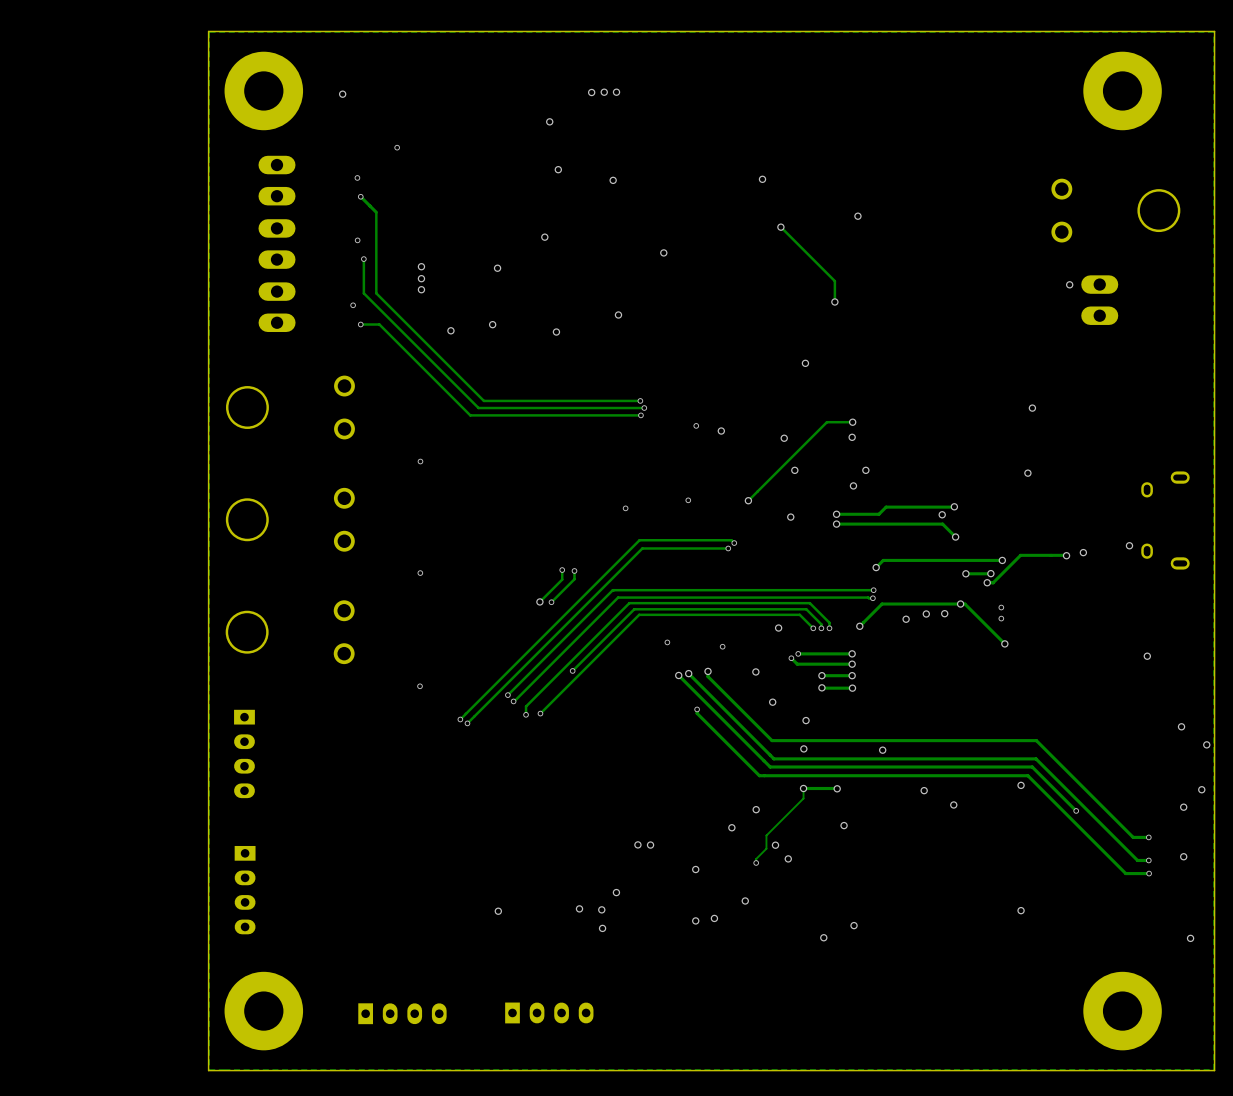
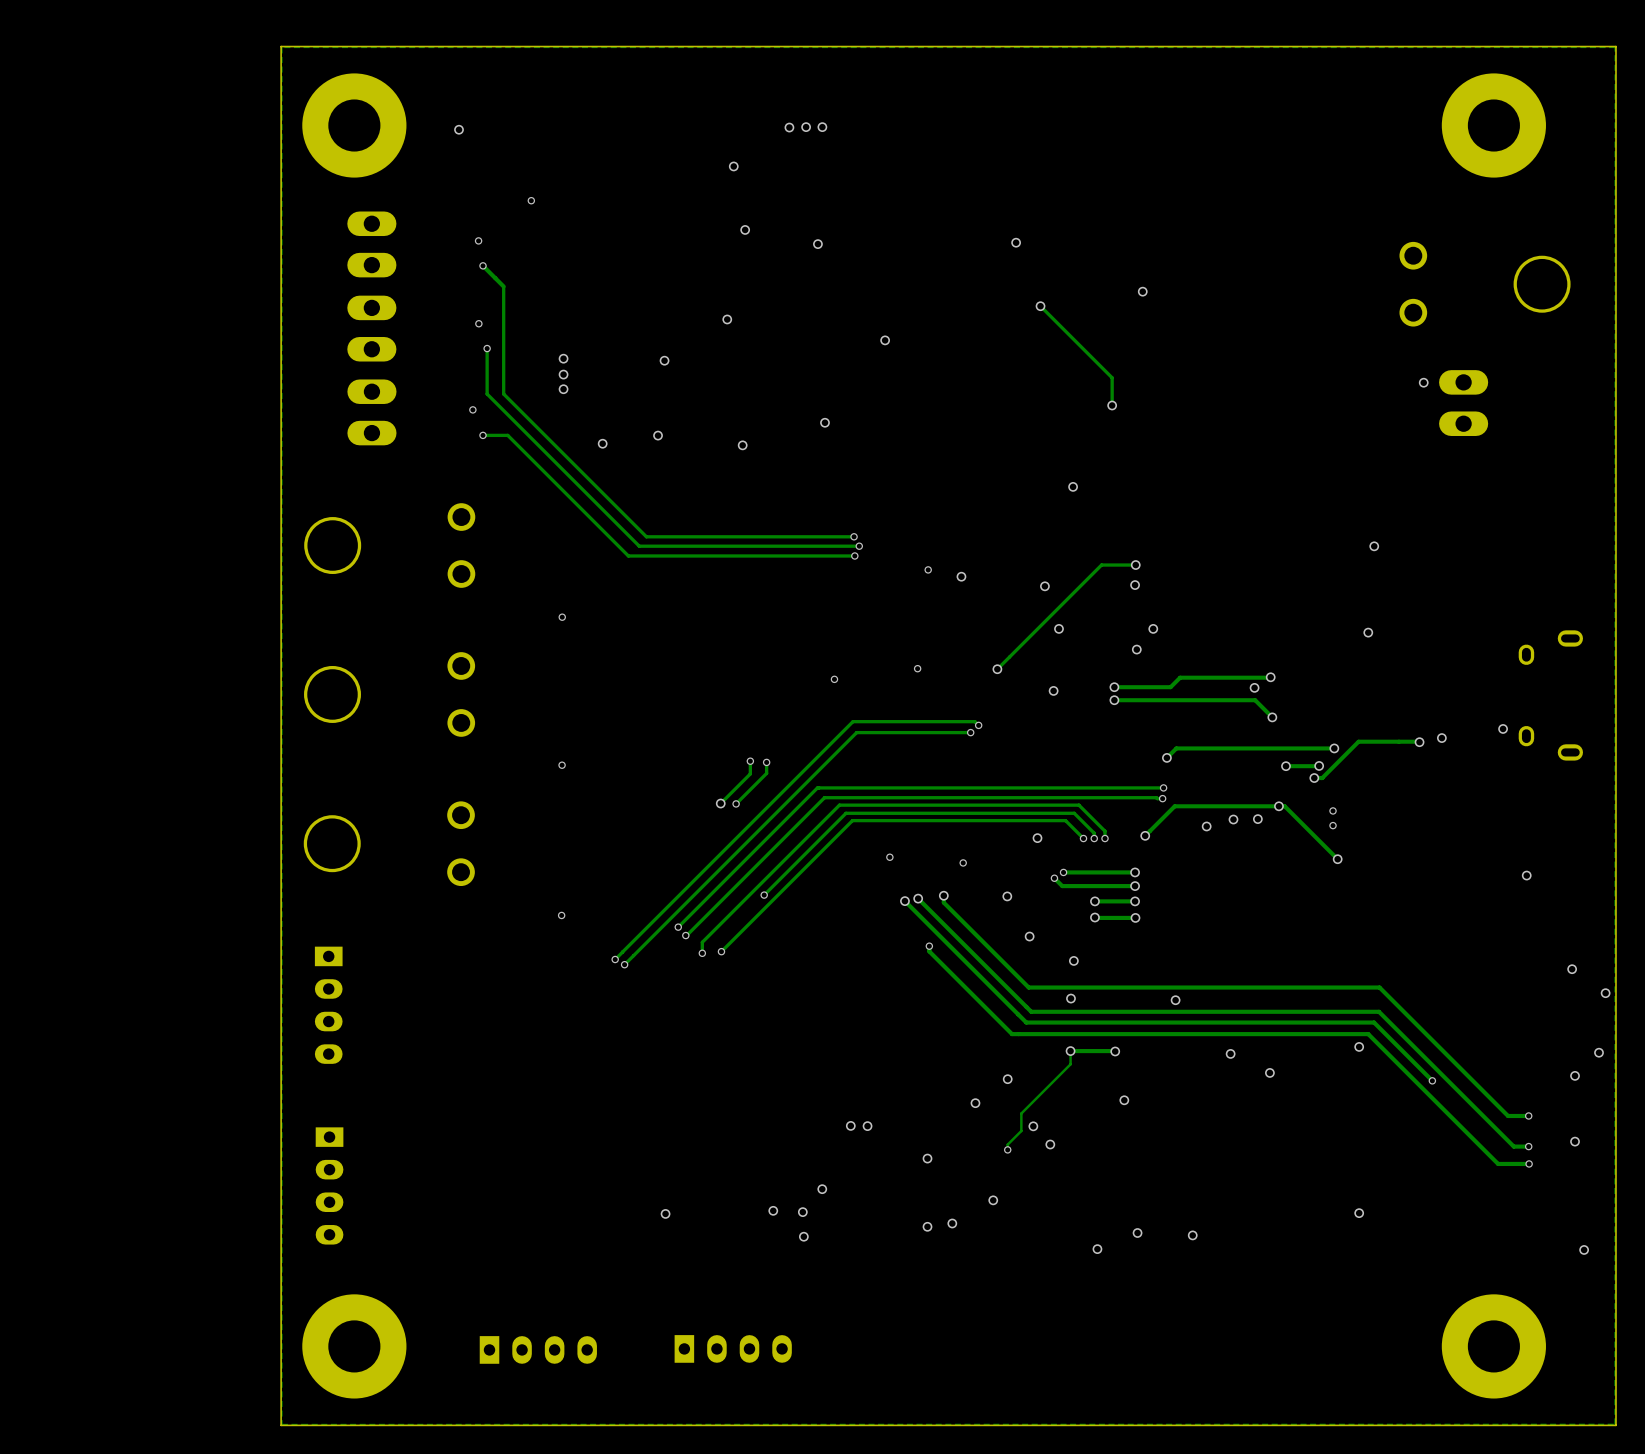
via: none -> (1192, 1235)

